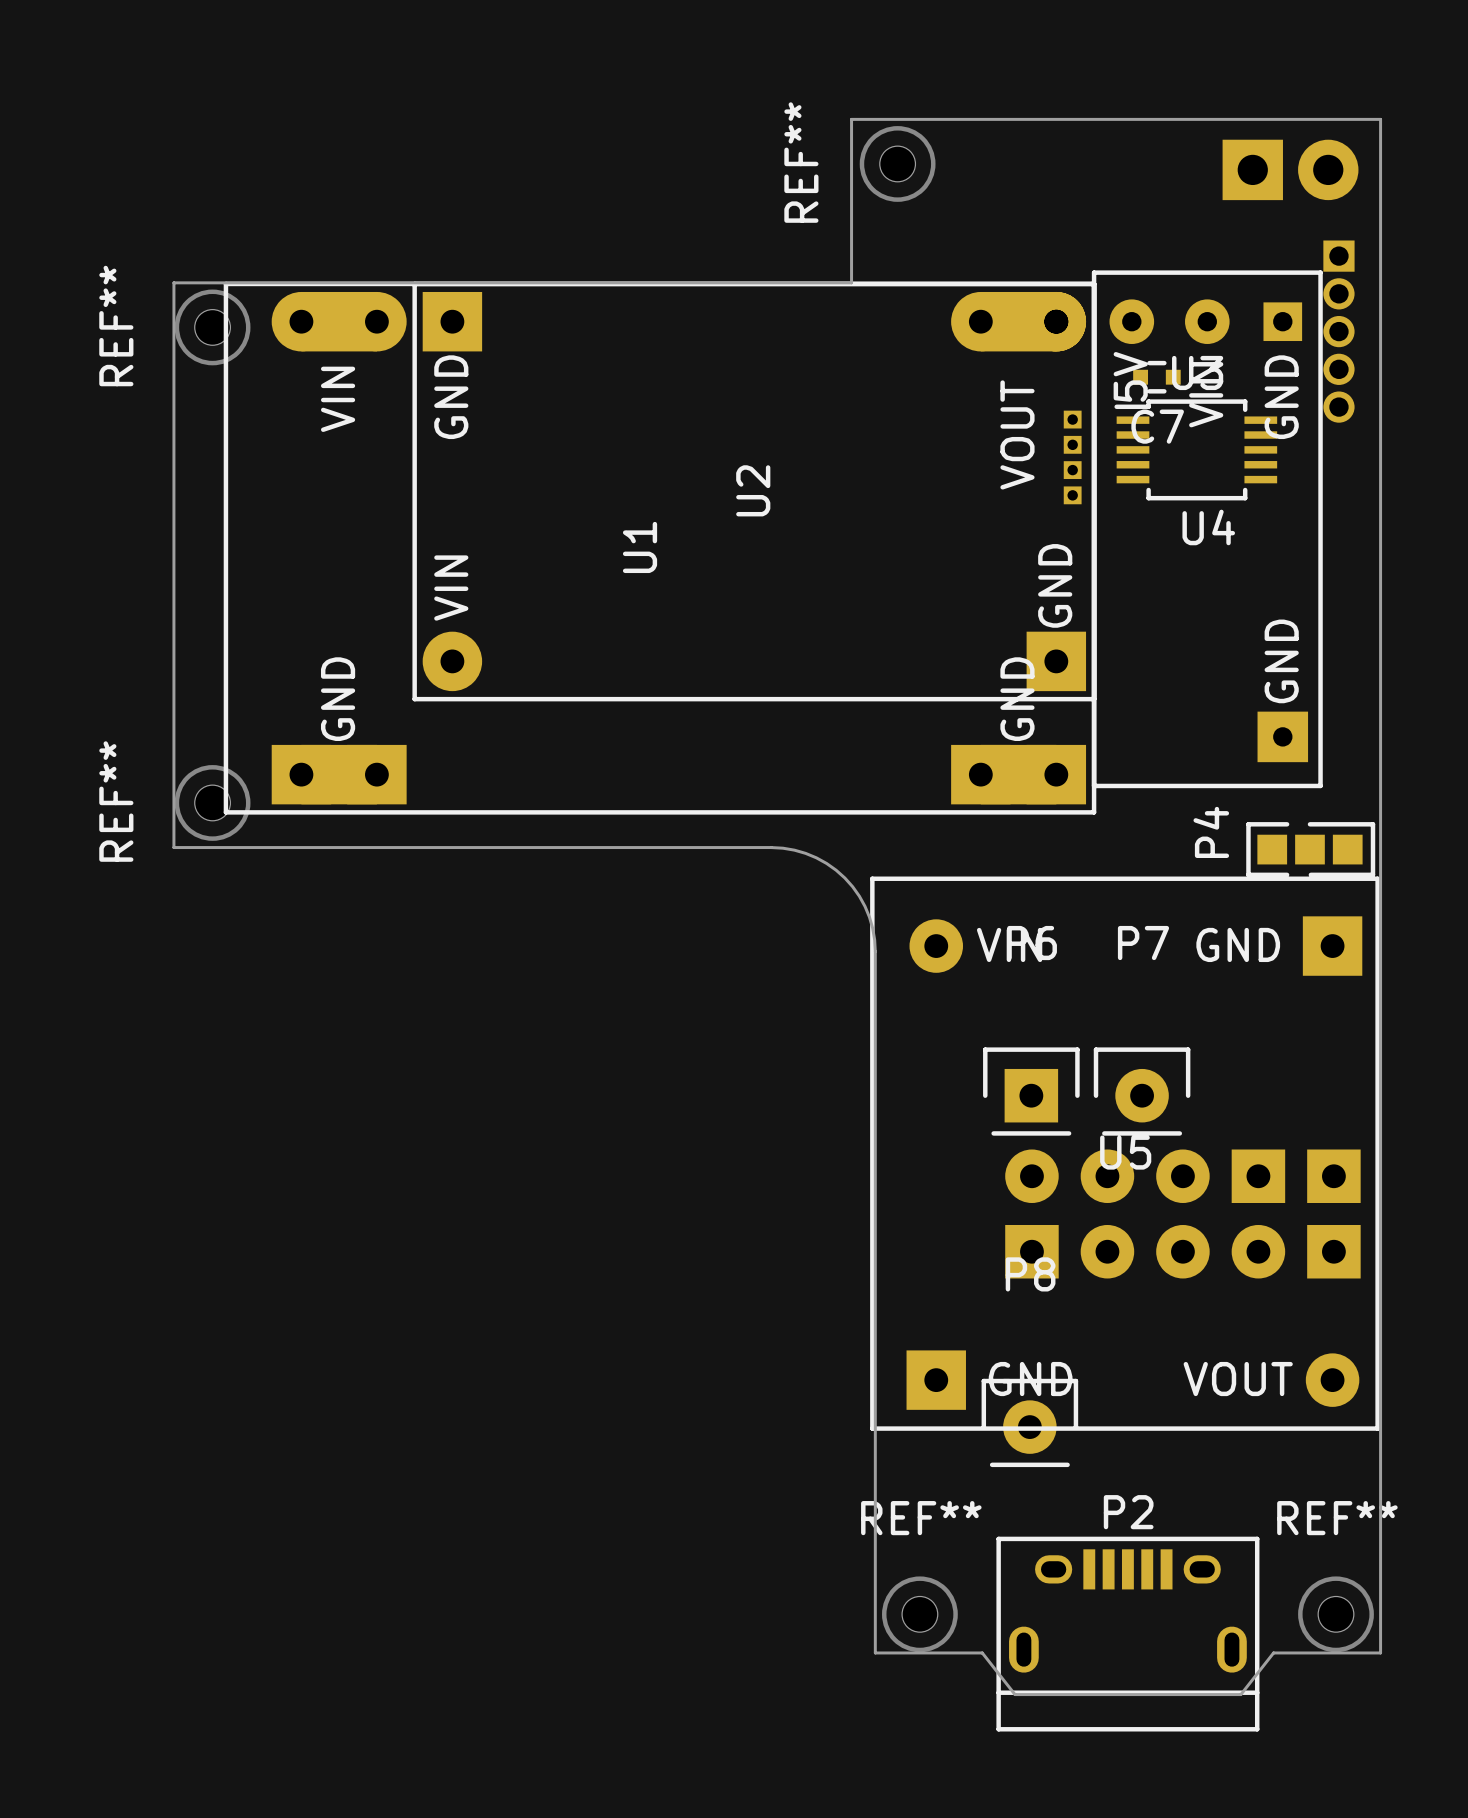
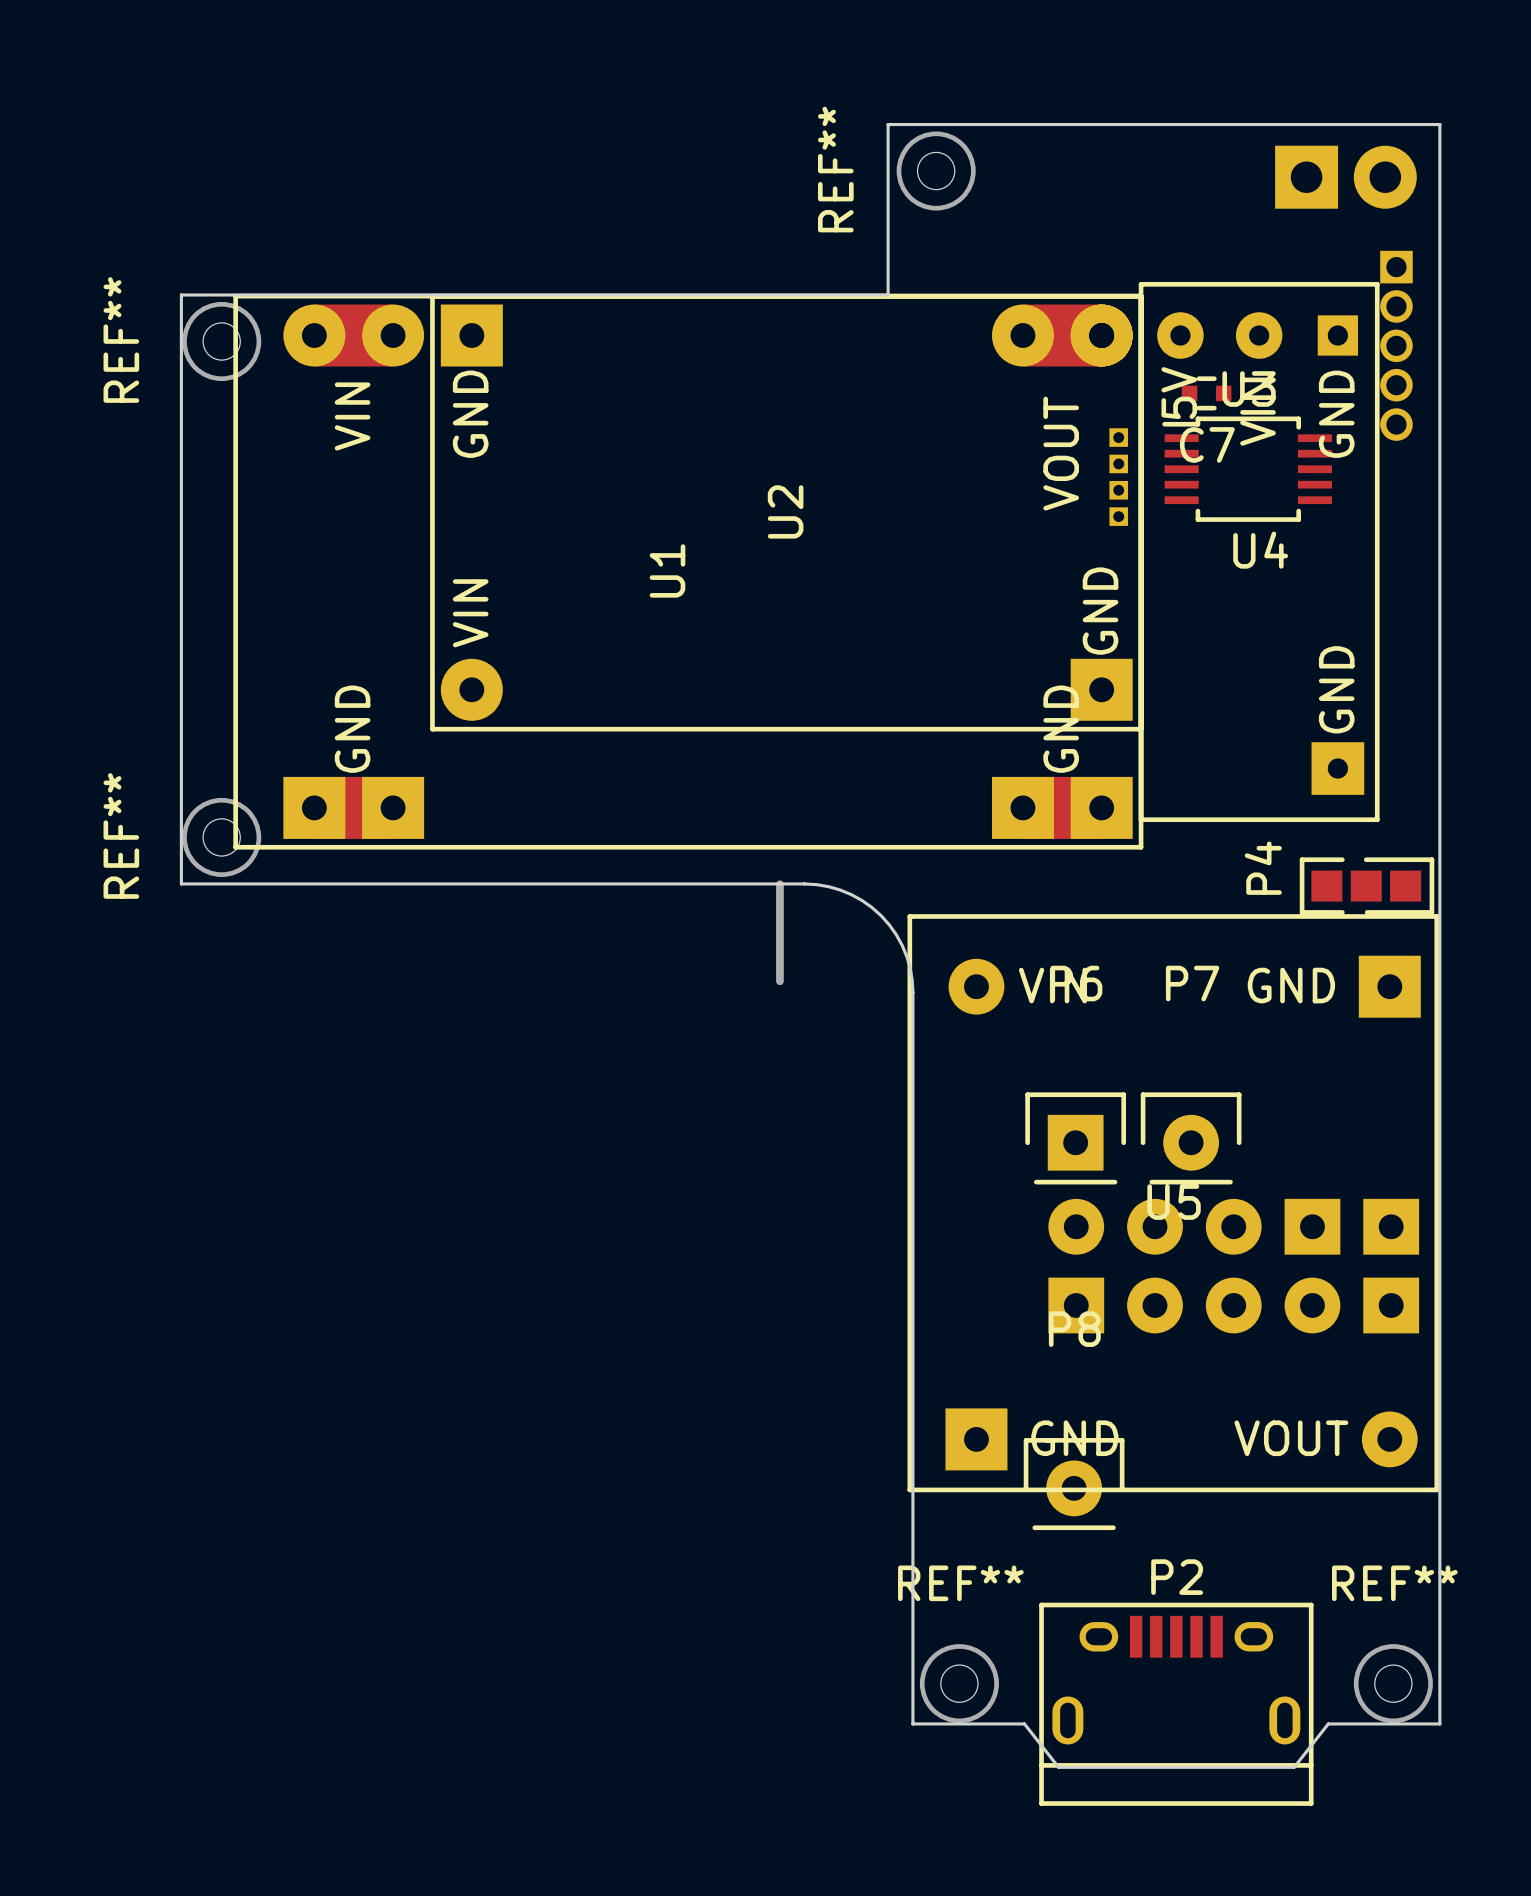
line: none -> (779, 884) (779, 981)

